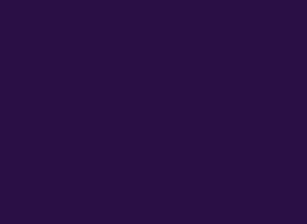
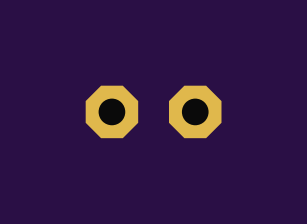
part: none -> (153, 111)

